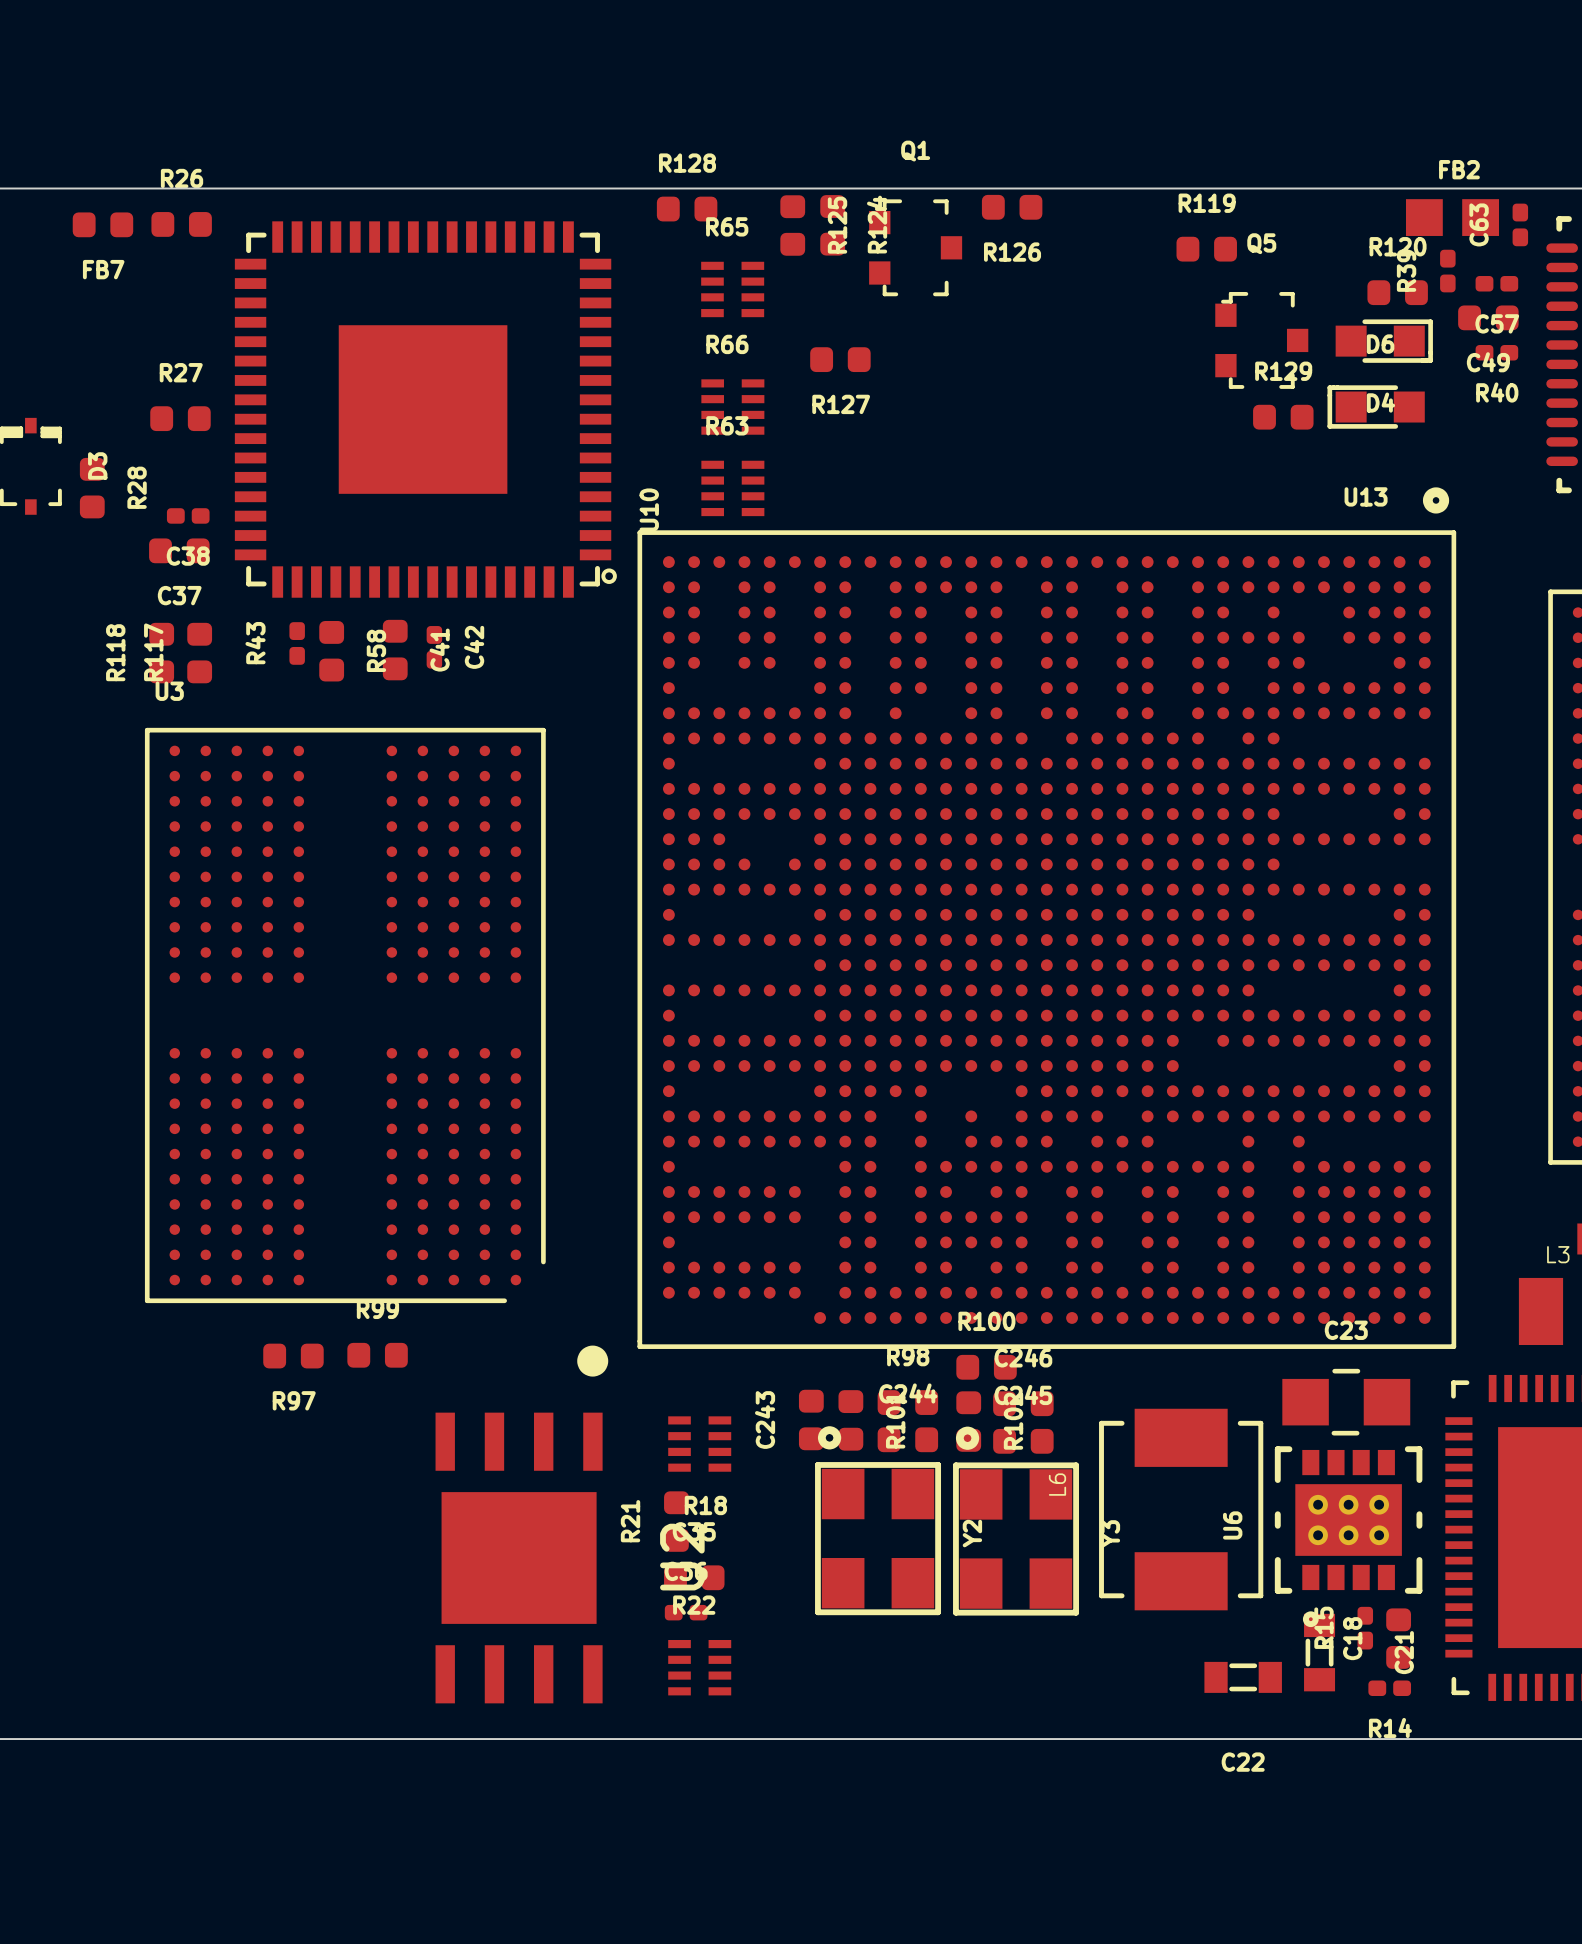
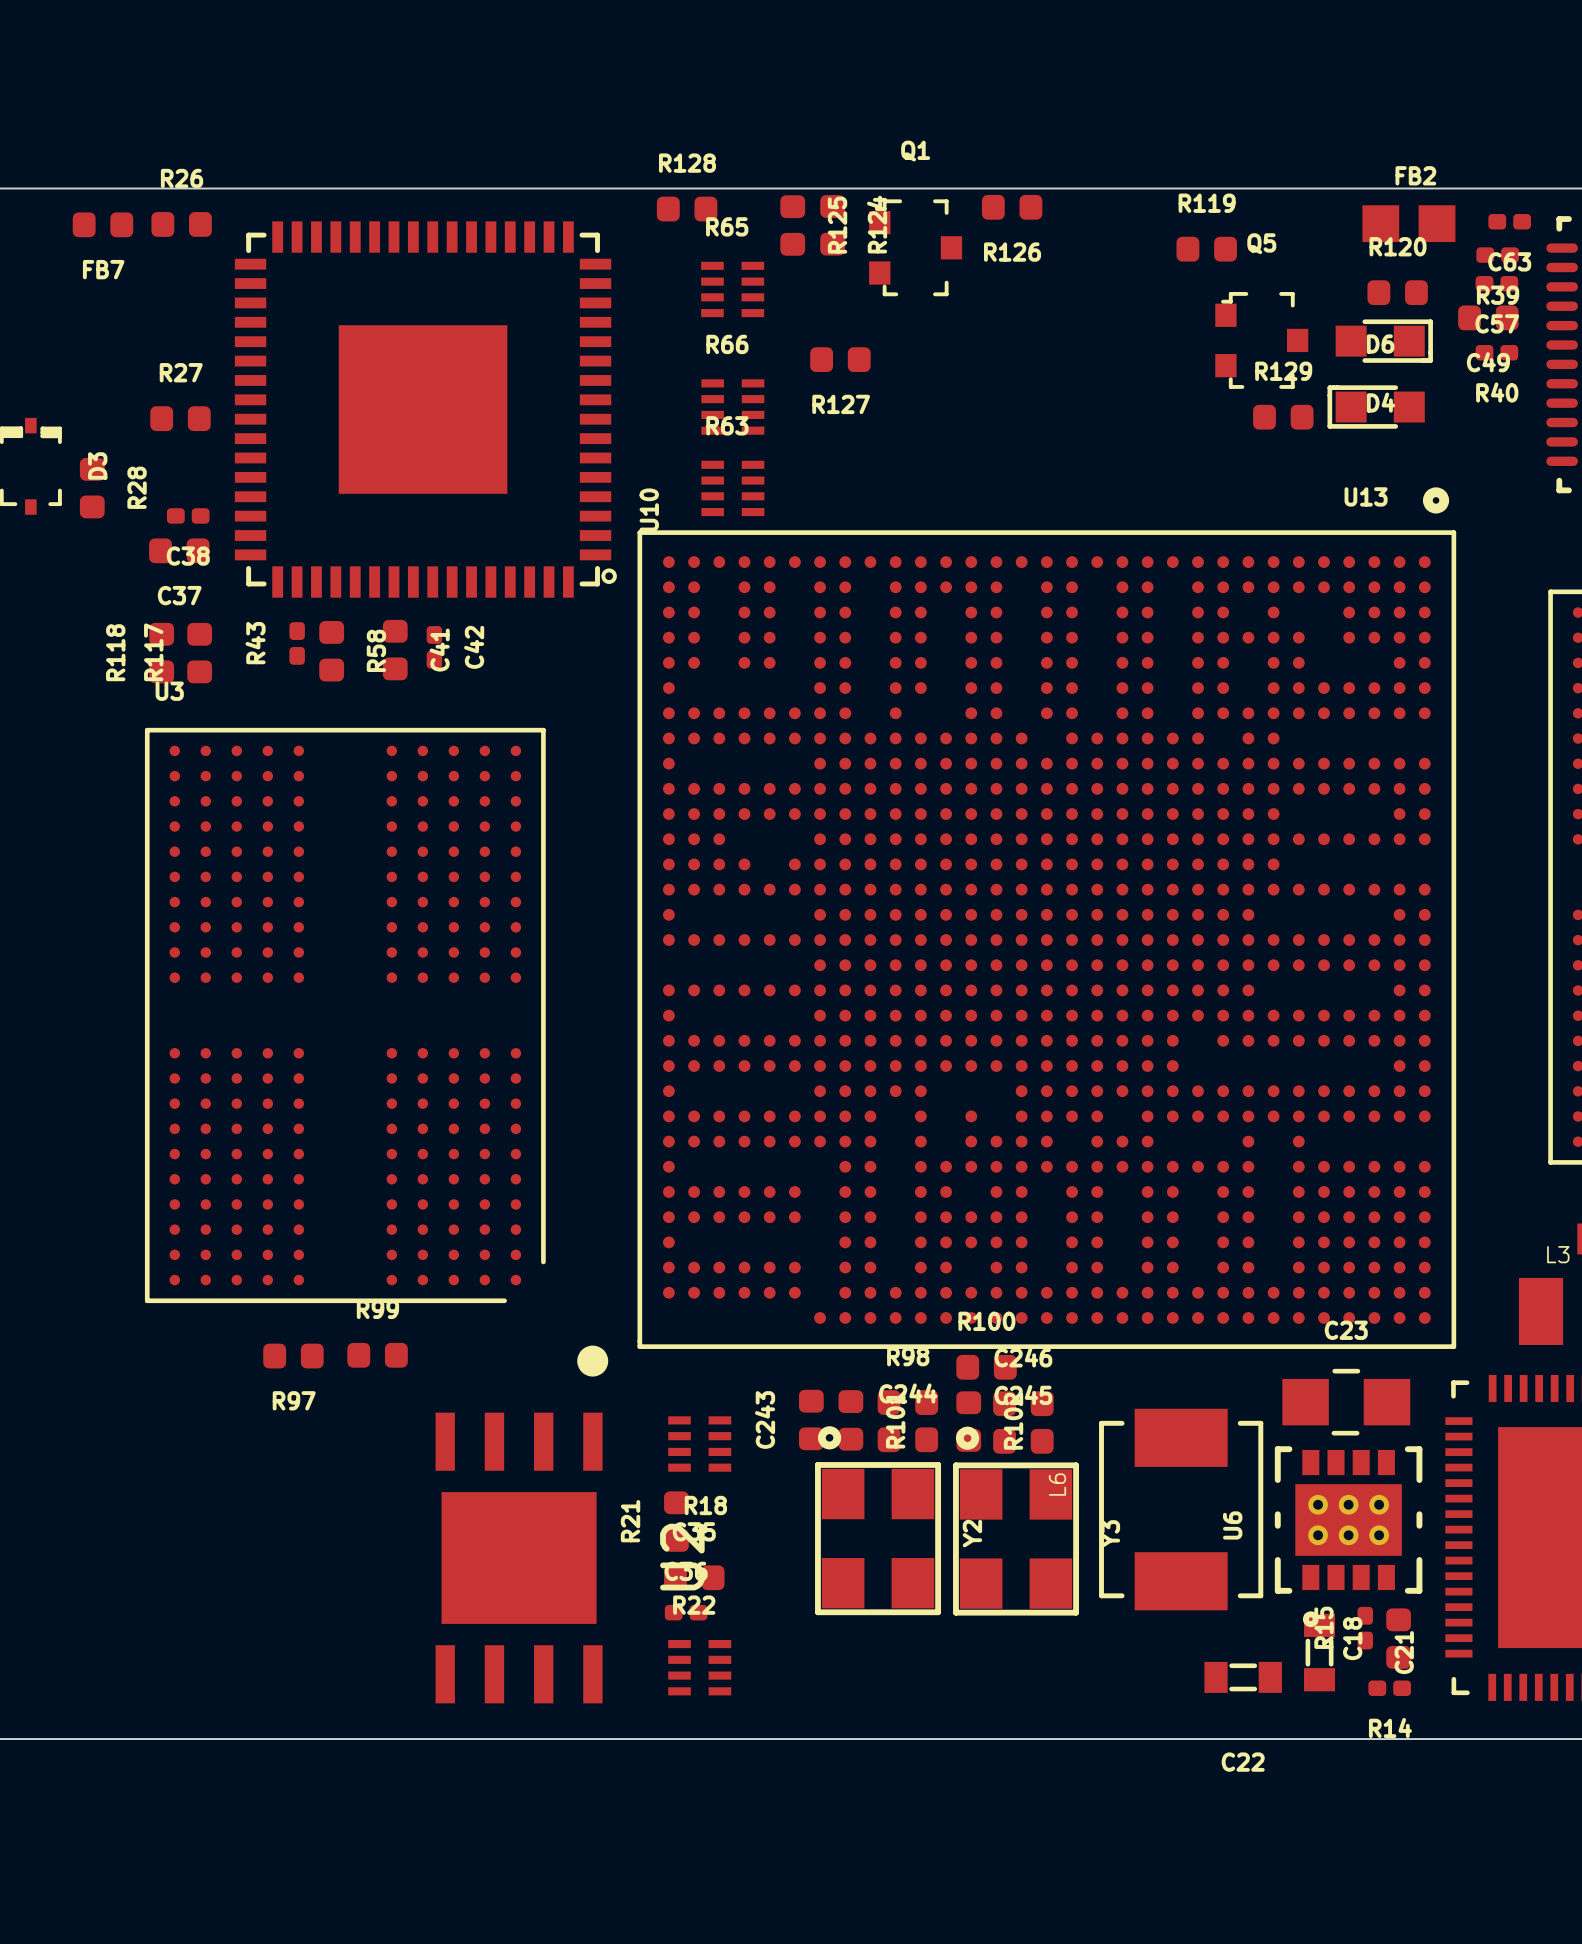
FB2 position: (1452, 217) -> (1408, 223)
C63 rotation: 0° (1520, 224) -> 90° clockwise (1509, 221)
R39 rotation: 0° (1447, 271) -> 90° clockwise (1497, 255)
R39 position: (1447, 271) -> (1497, 255)

